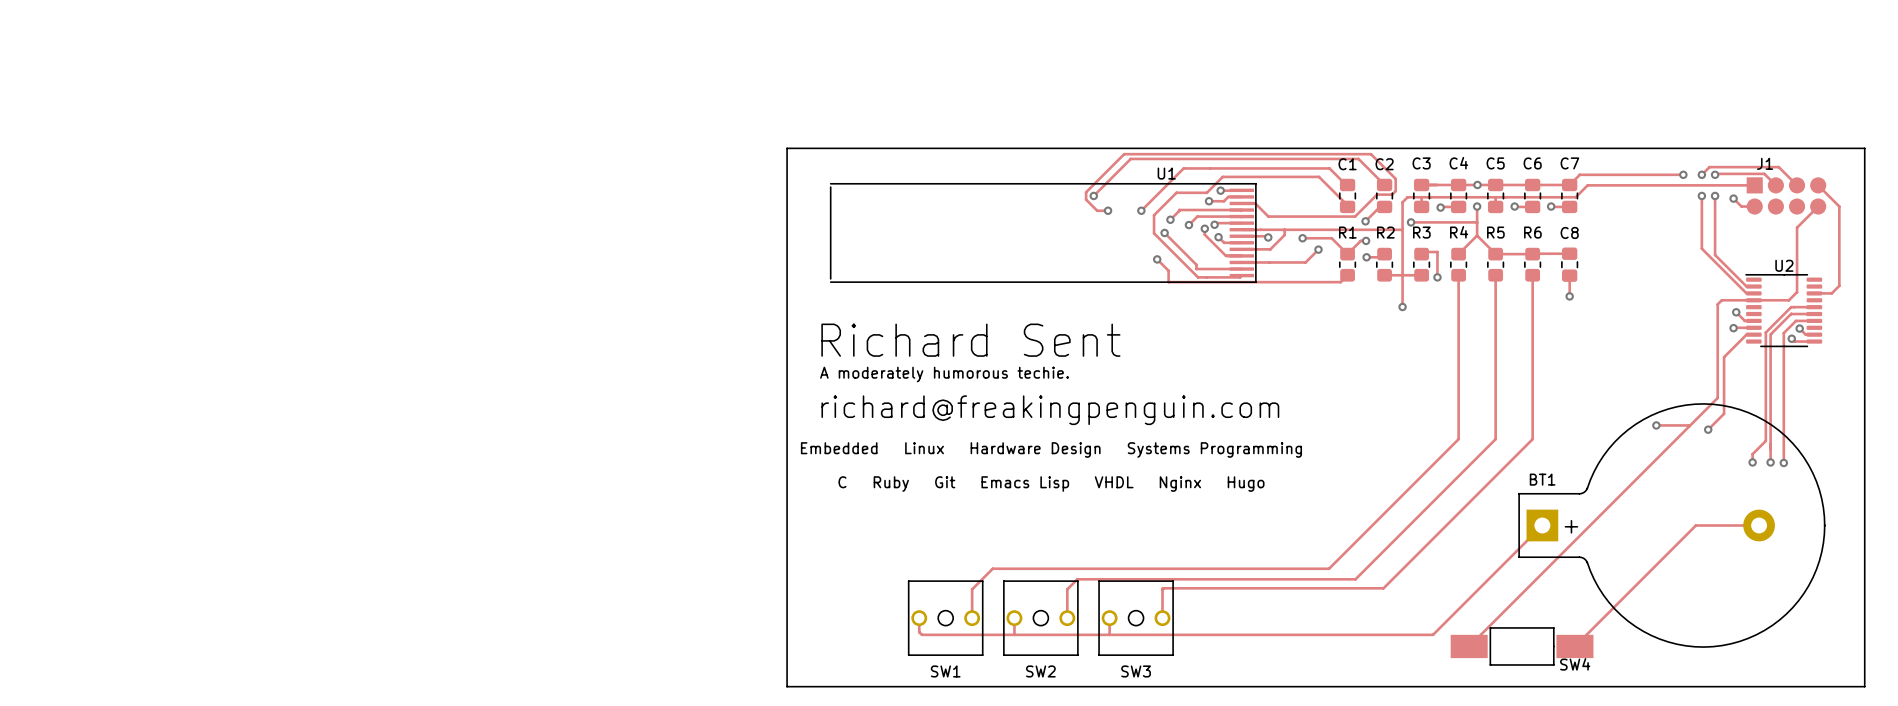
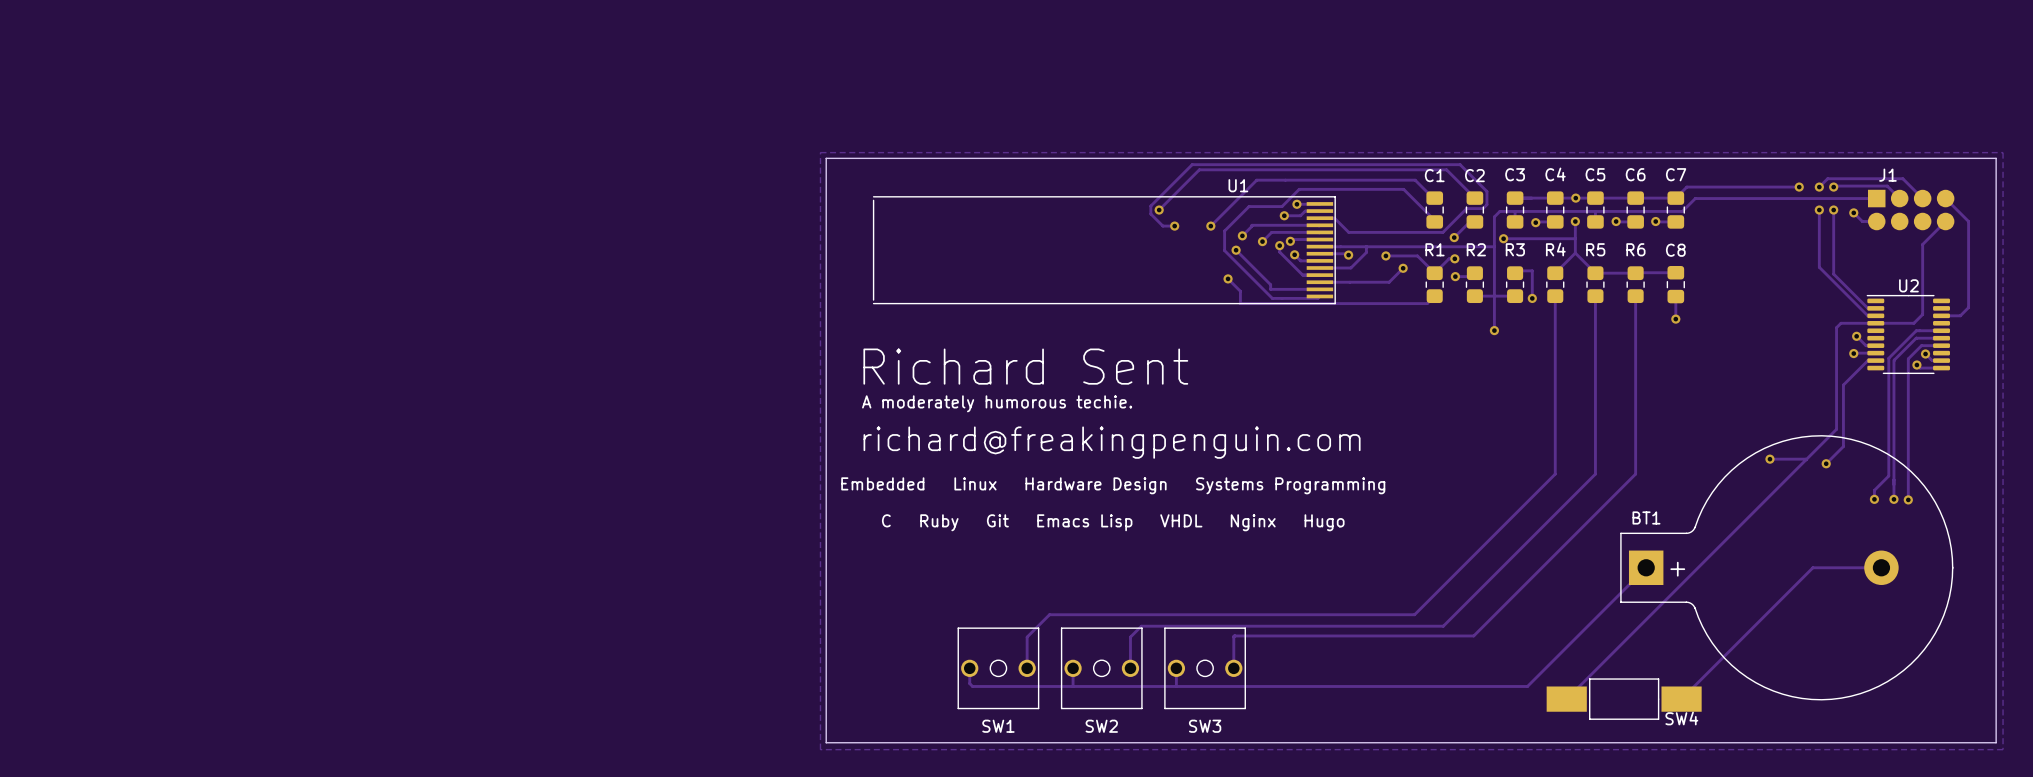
zone outline: none -> (820, 152) (820, 749) (2003, 749) (2003, 152) (820, 152)

